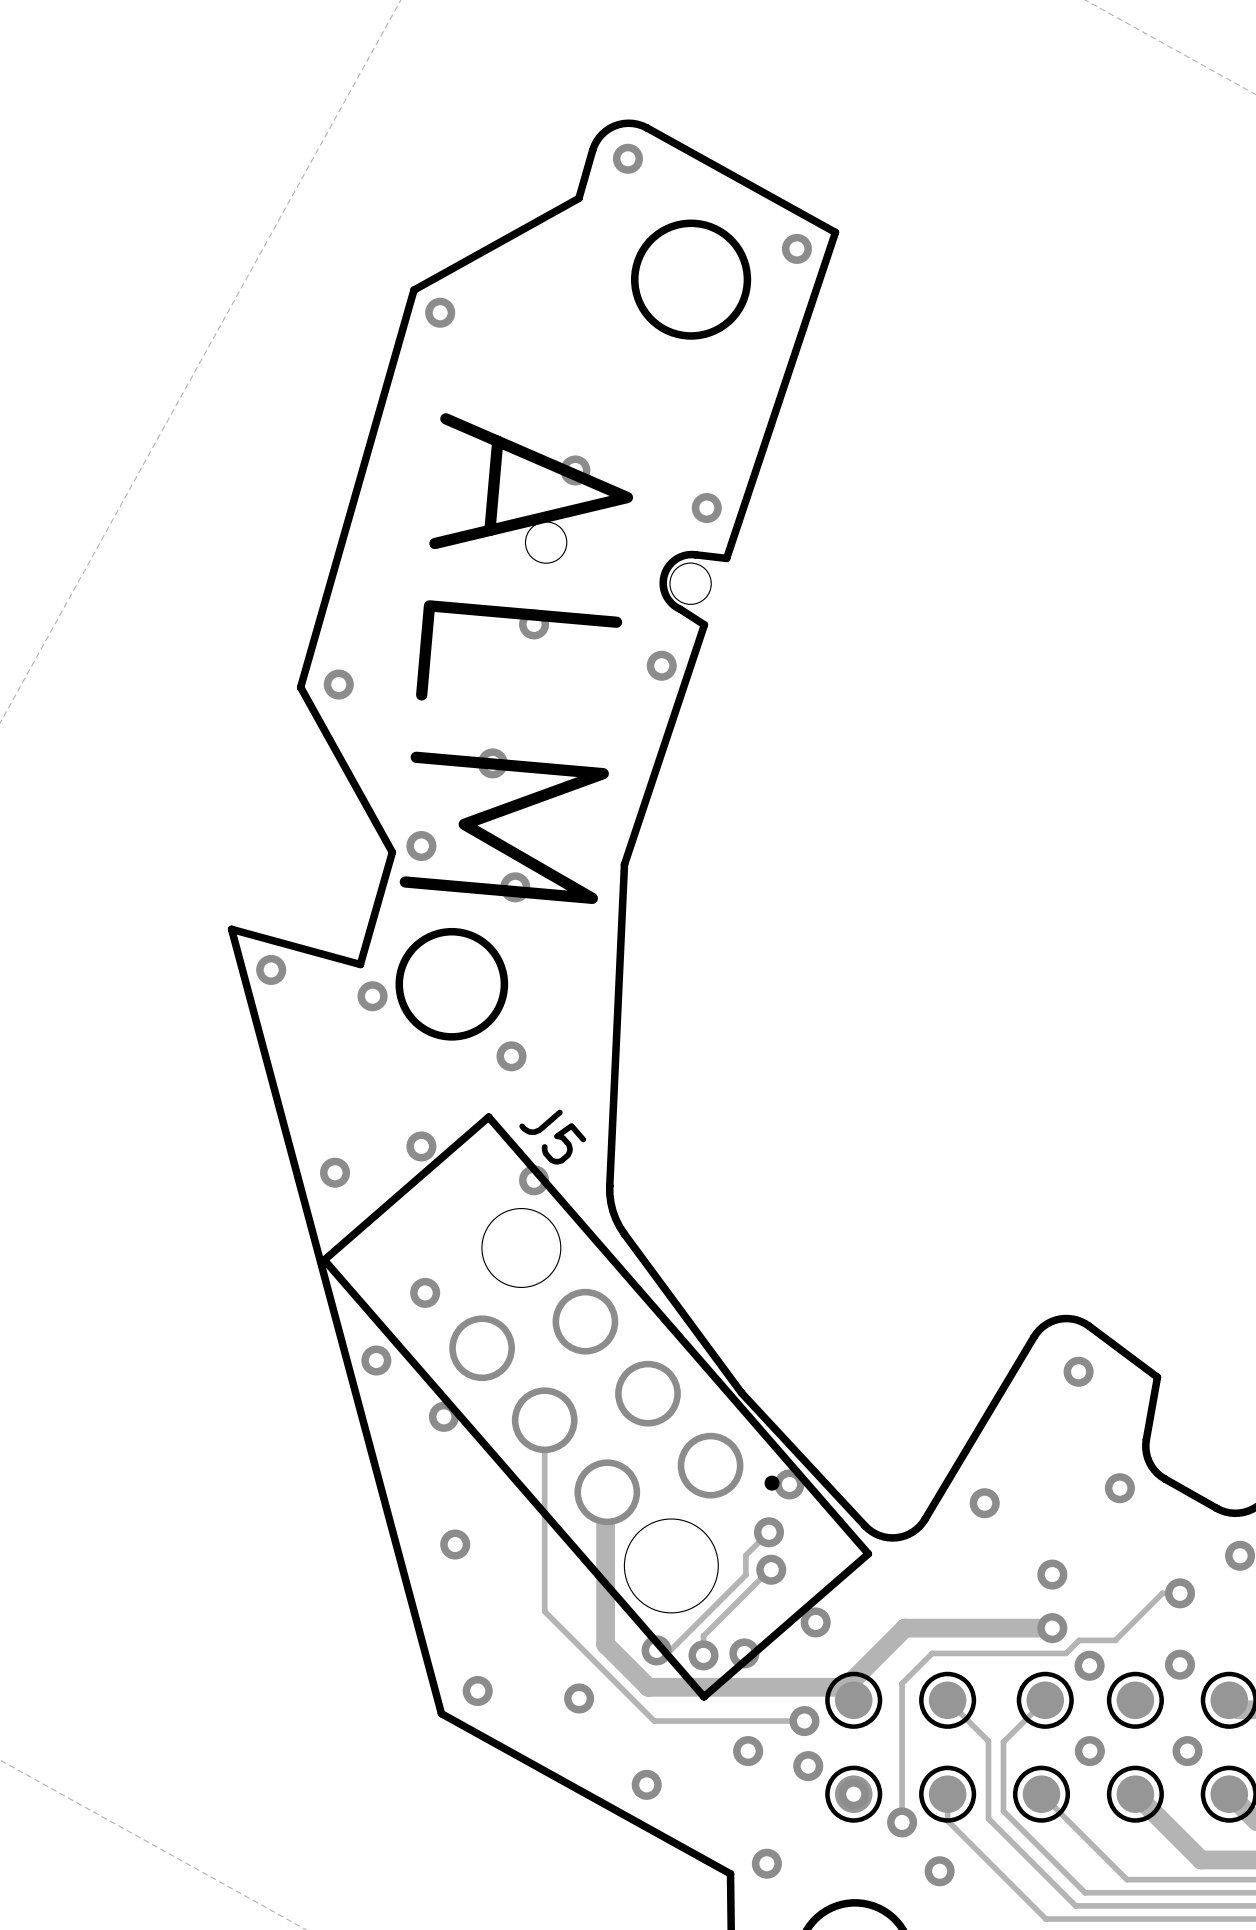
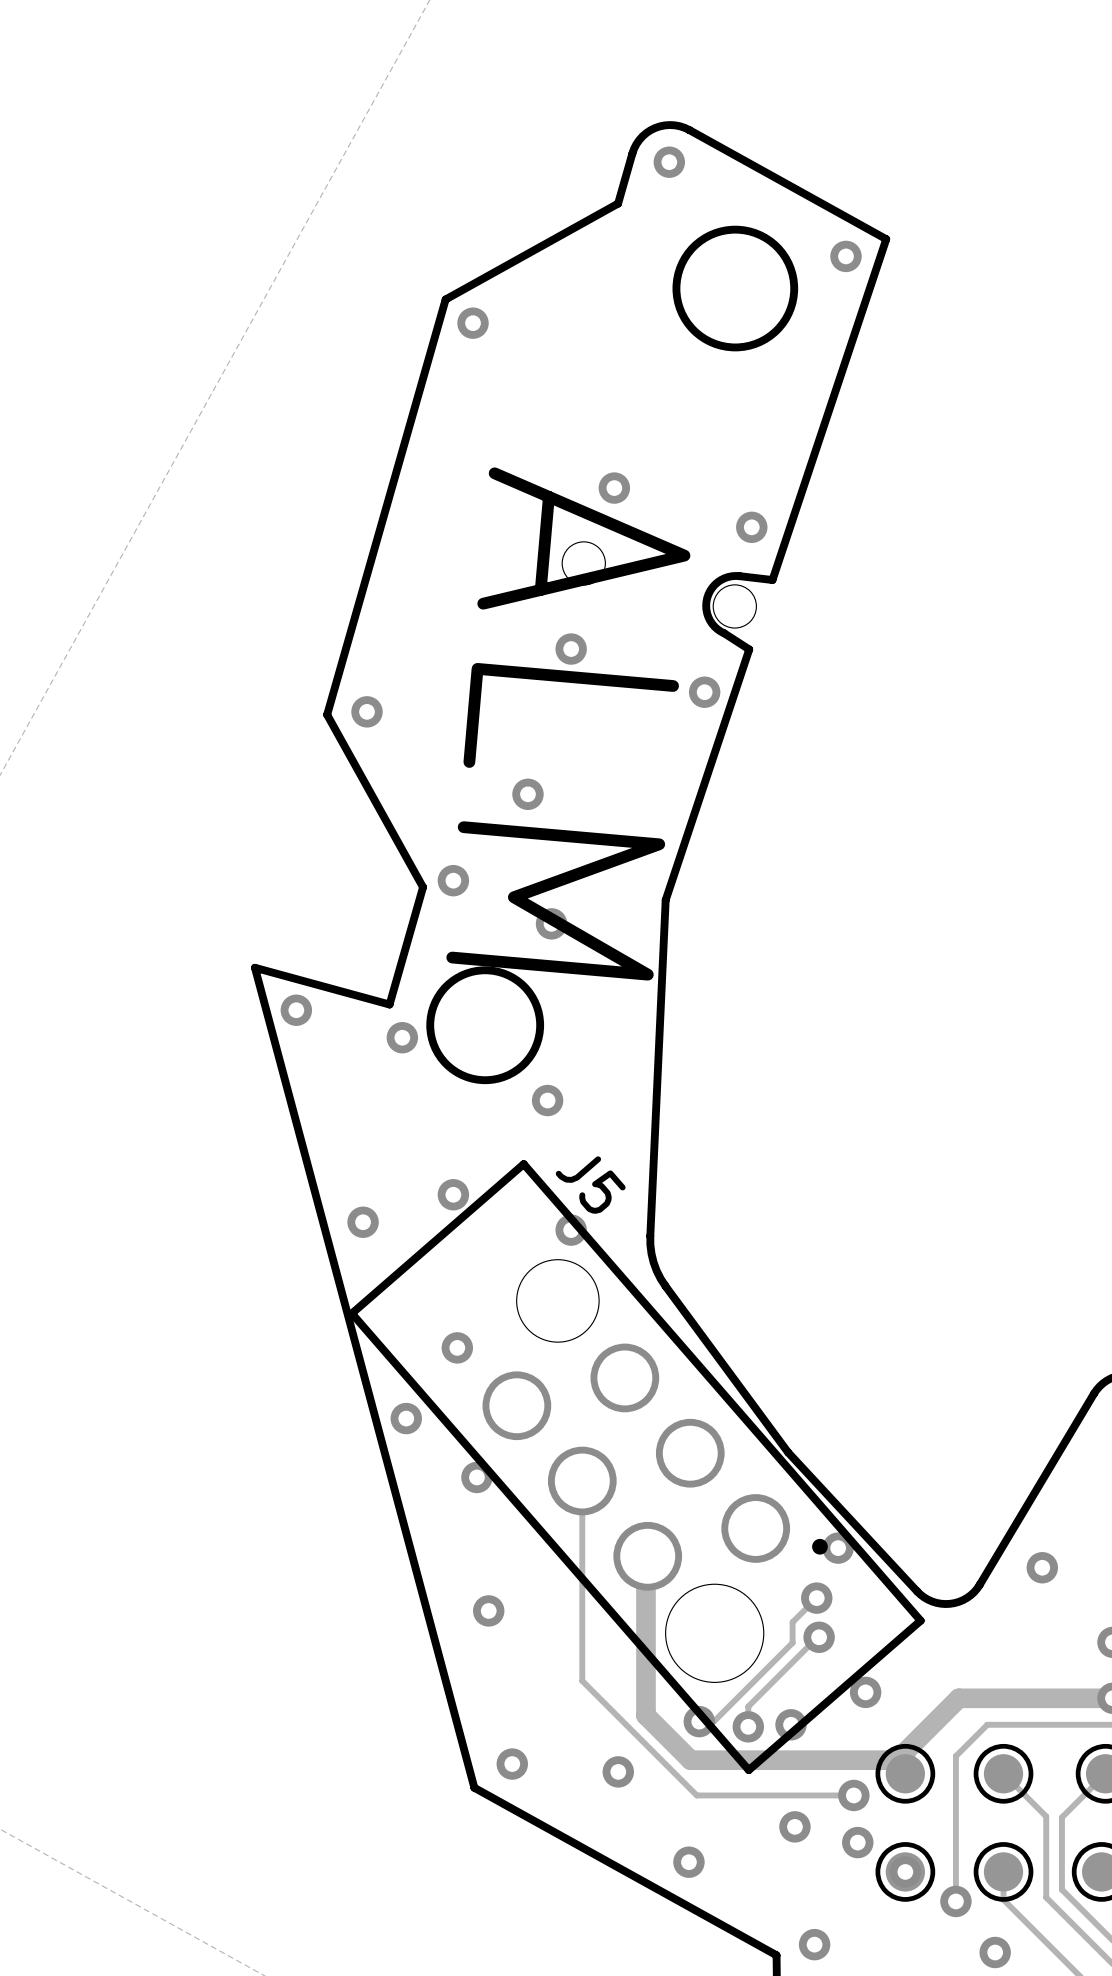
text position: ALM (516, 658) -> ALM (568, 723)

